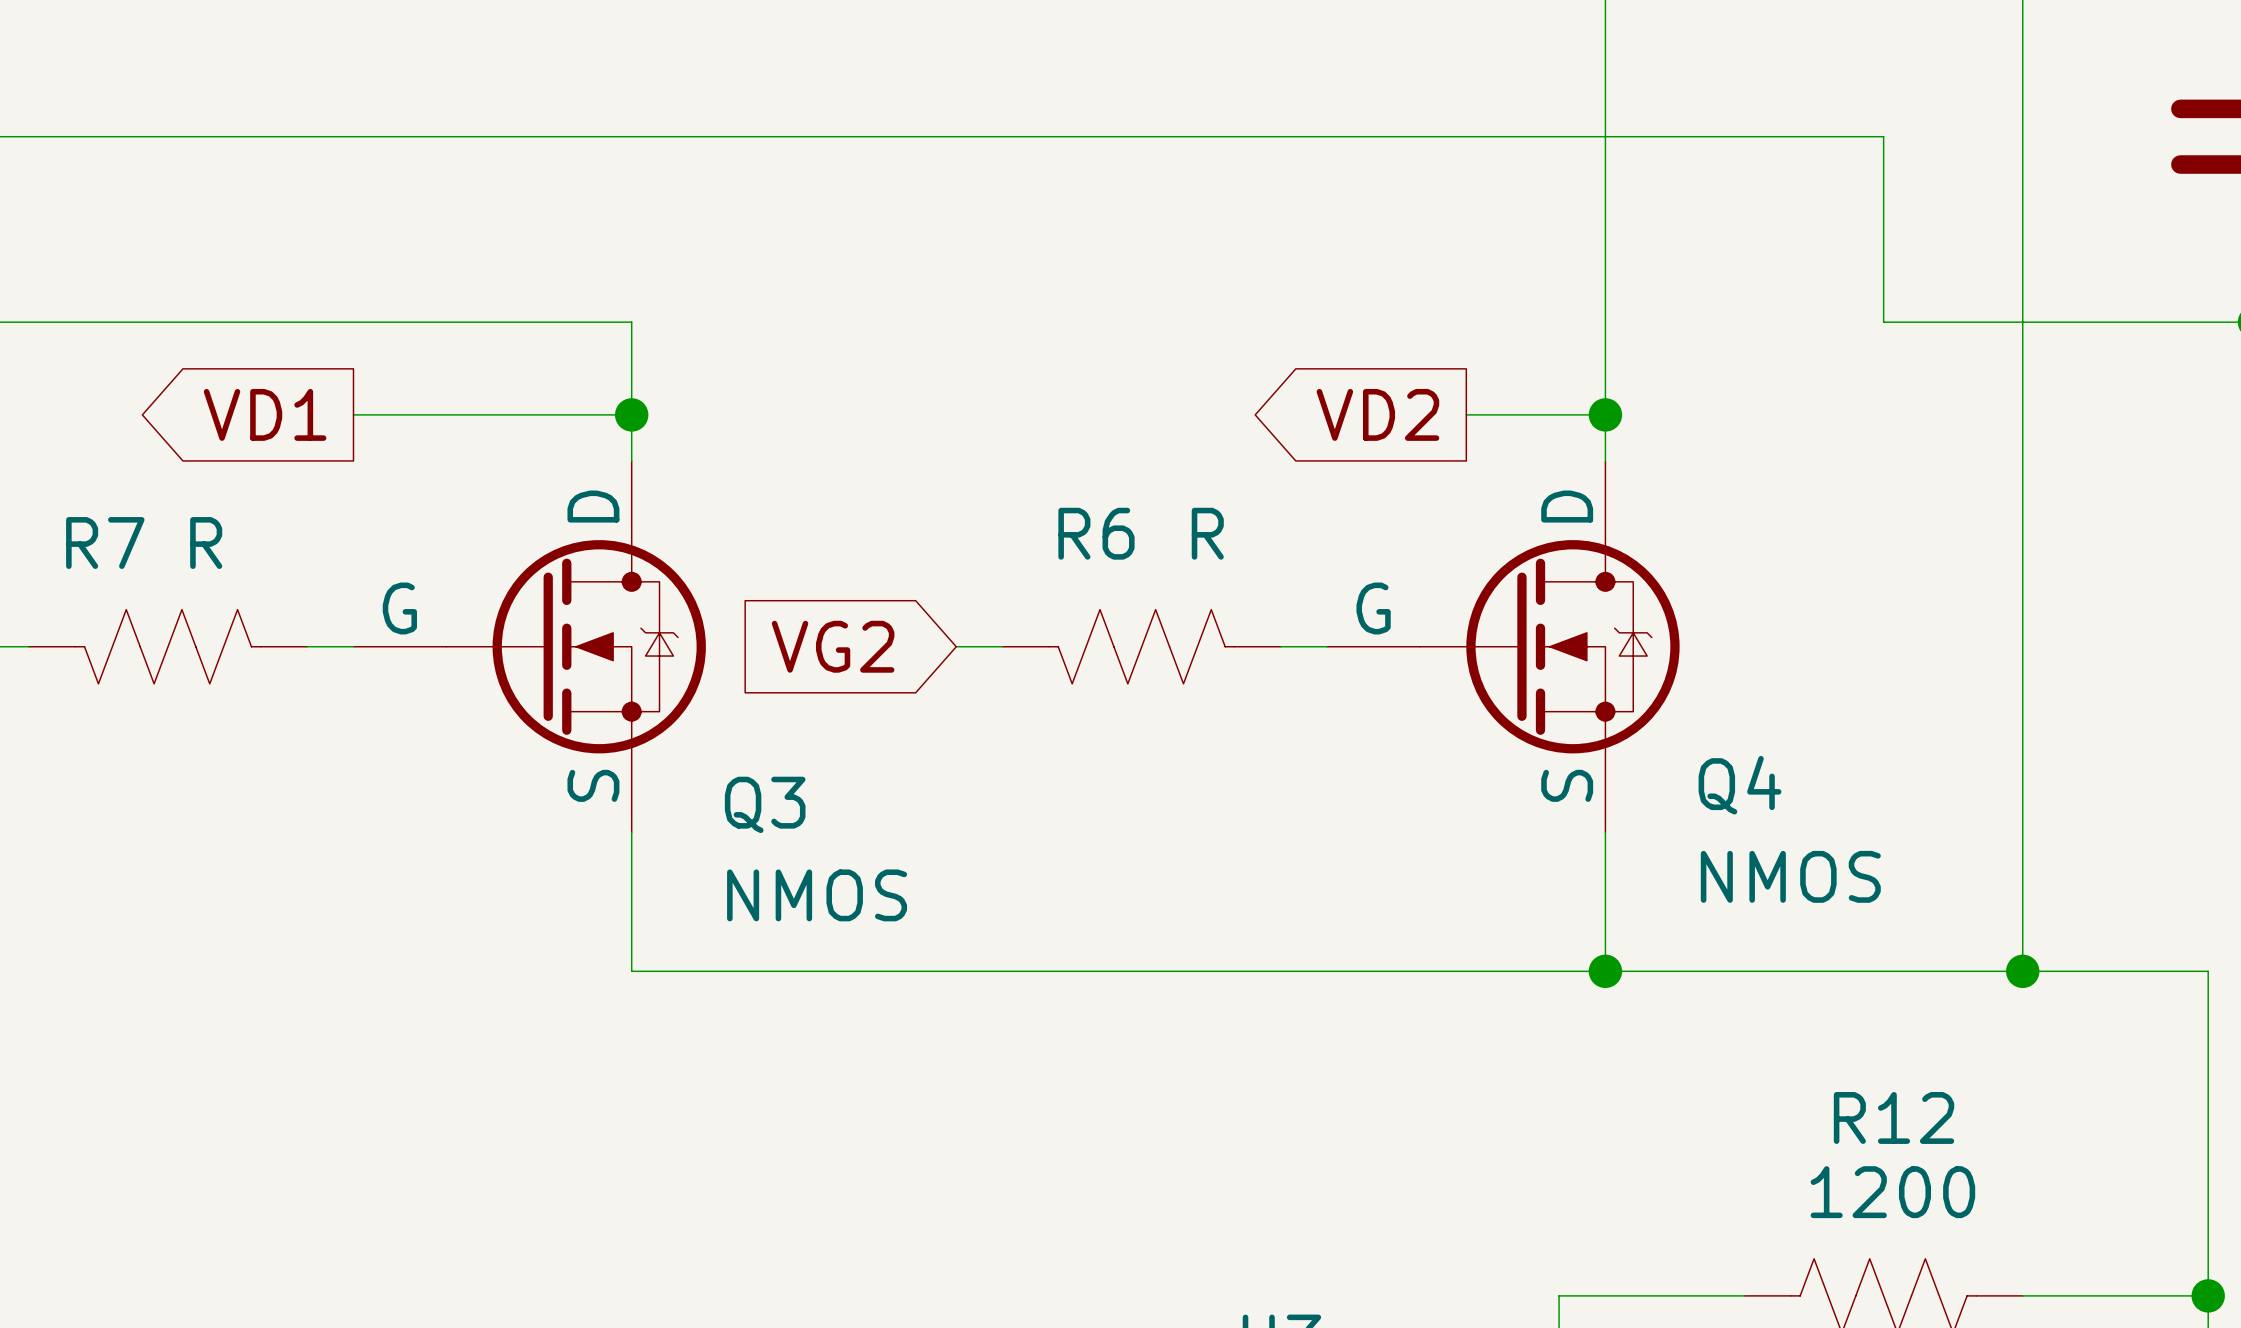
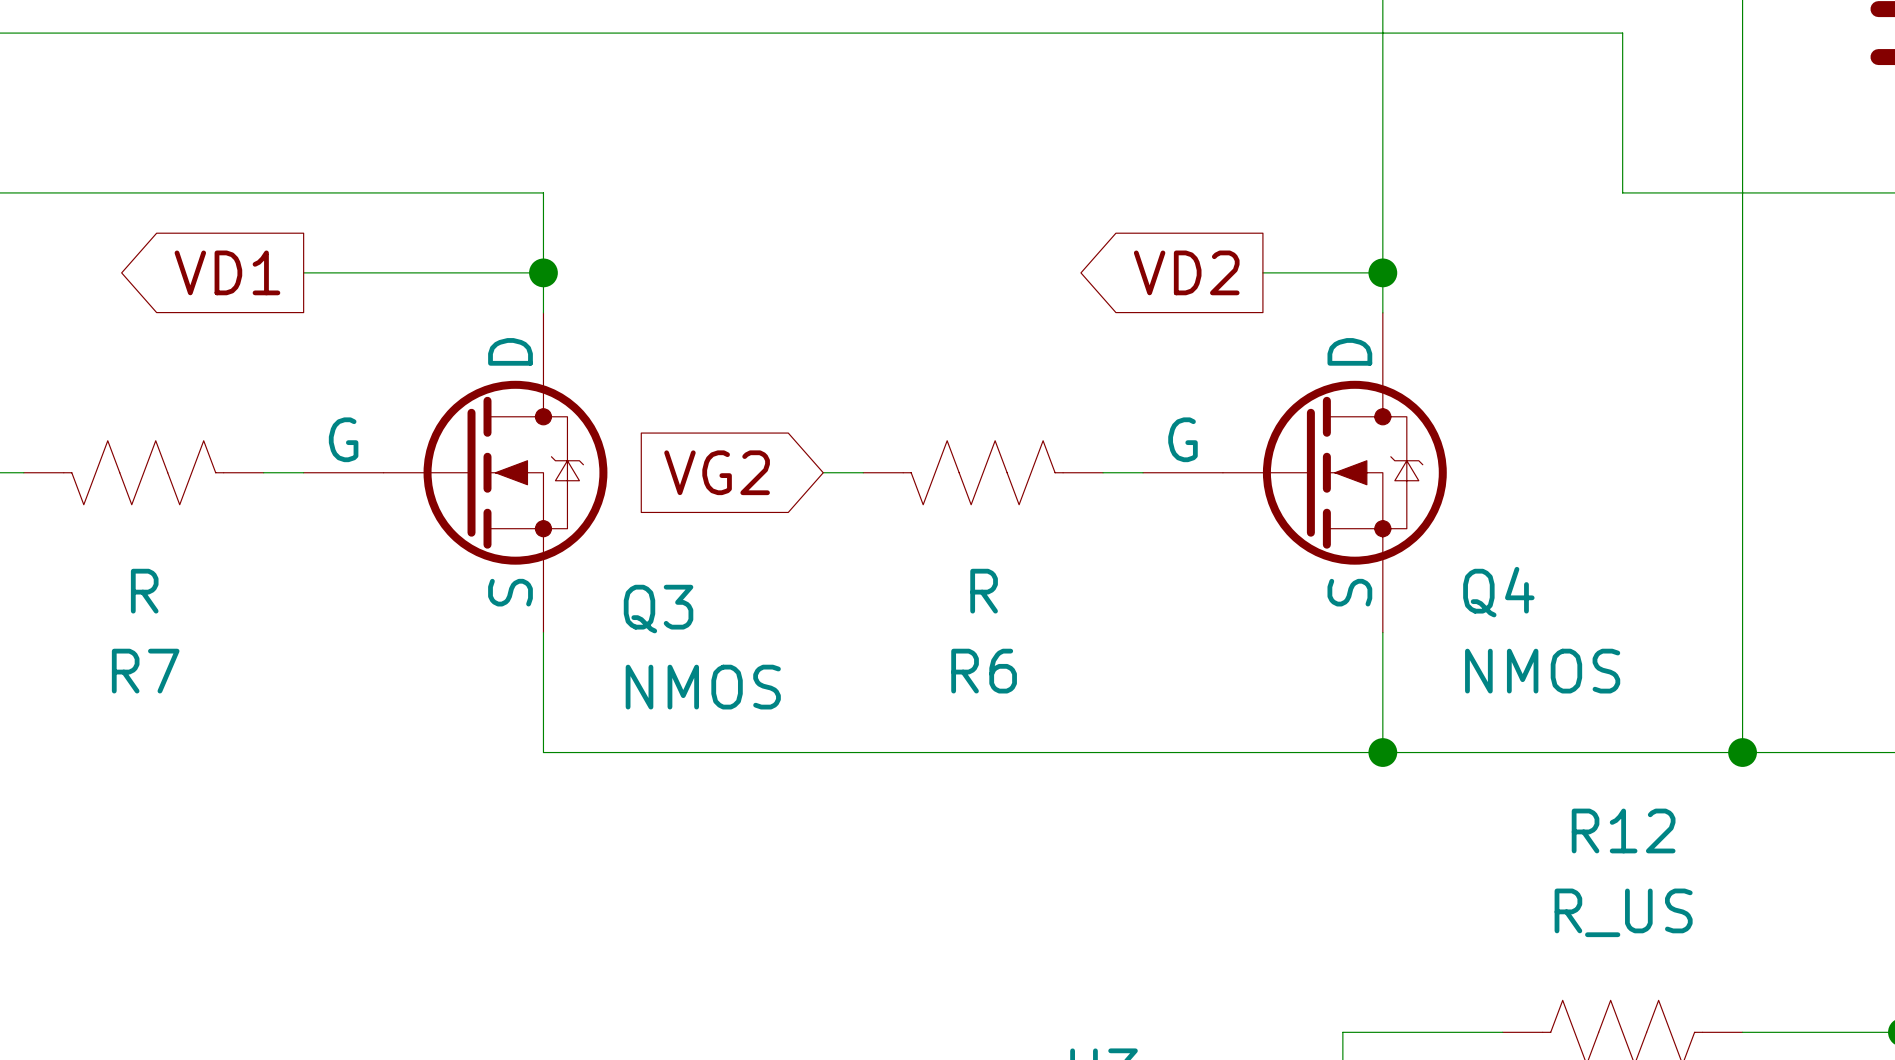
R6 name position: R6 (1096, 533) -> R6 (984, 671)
R6 value position: R (1207, 533) -> R (984, 591)
R7 name position: R7 (105, 543) -> R7 (145, 671)
R7 value position: R (206, 543) -> R (144, 591)
R12 name position: R12 (1894, 1117) -> R12 (1623, 830)
R12 value: 1200 (1892, 1192) -> R_US (1623, 912)

